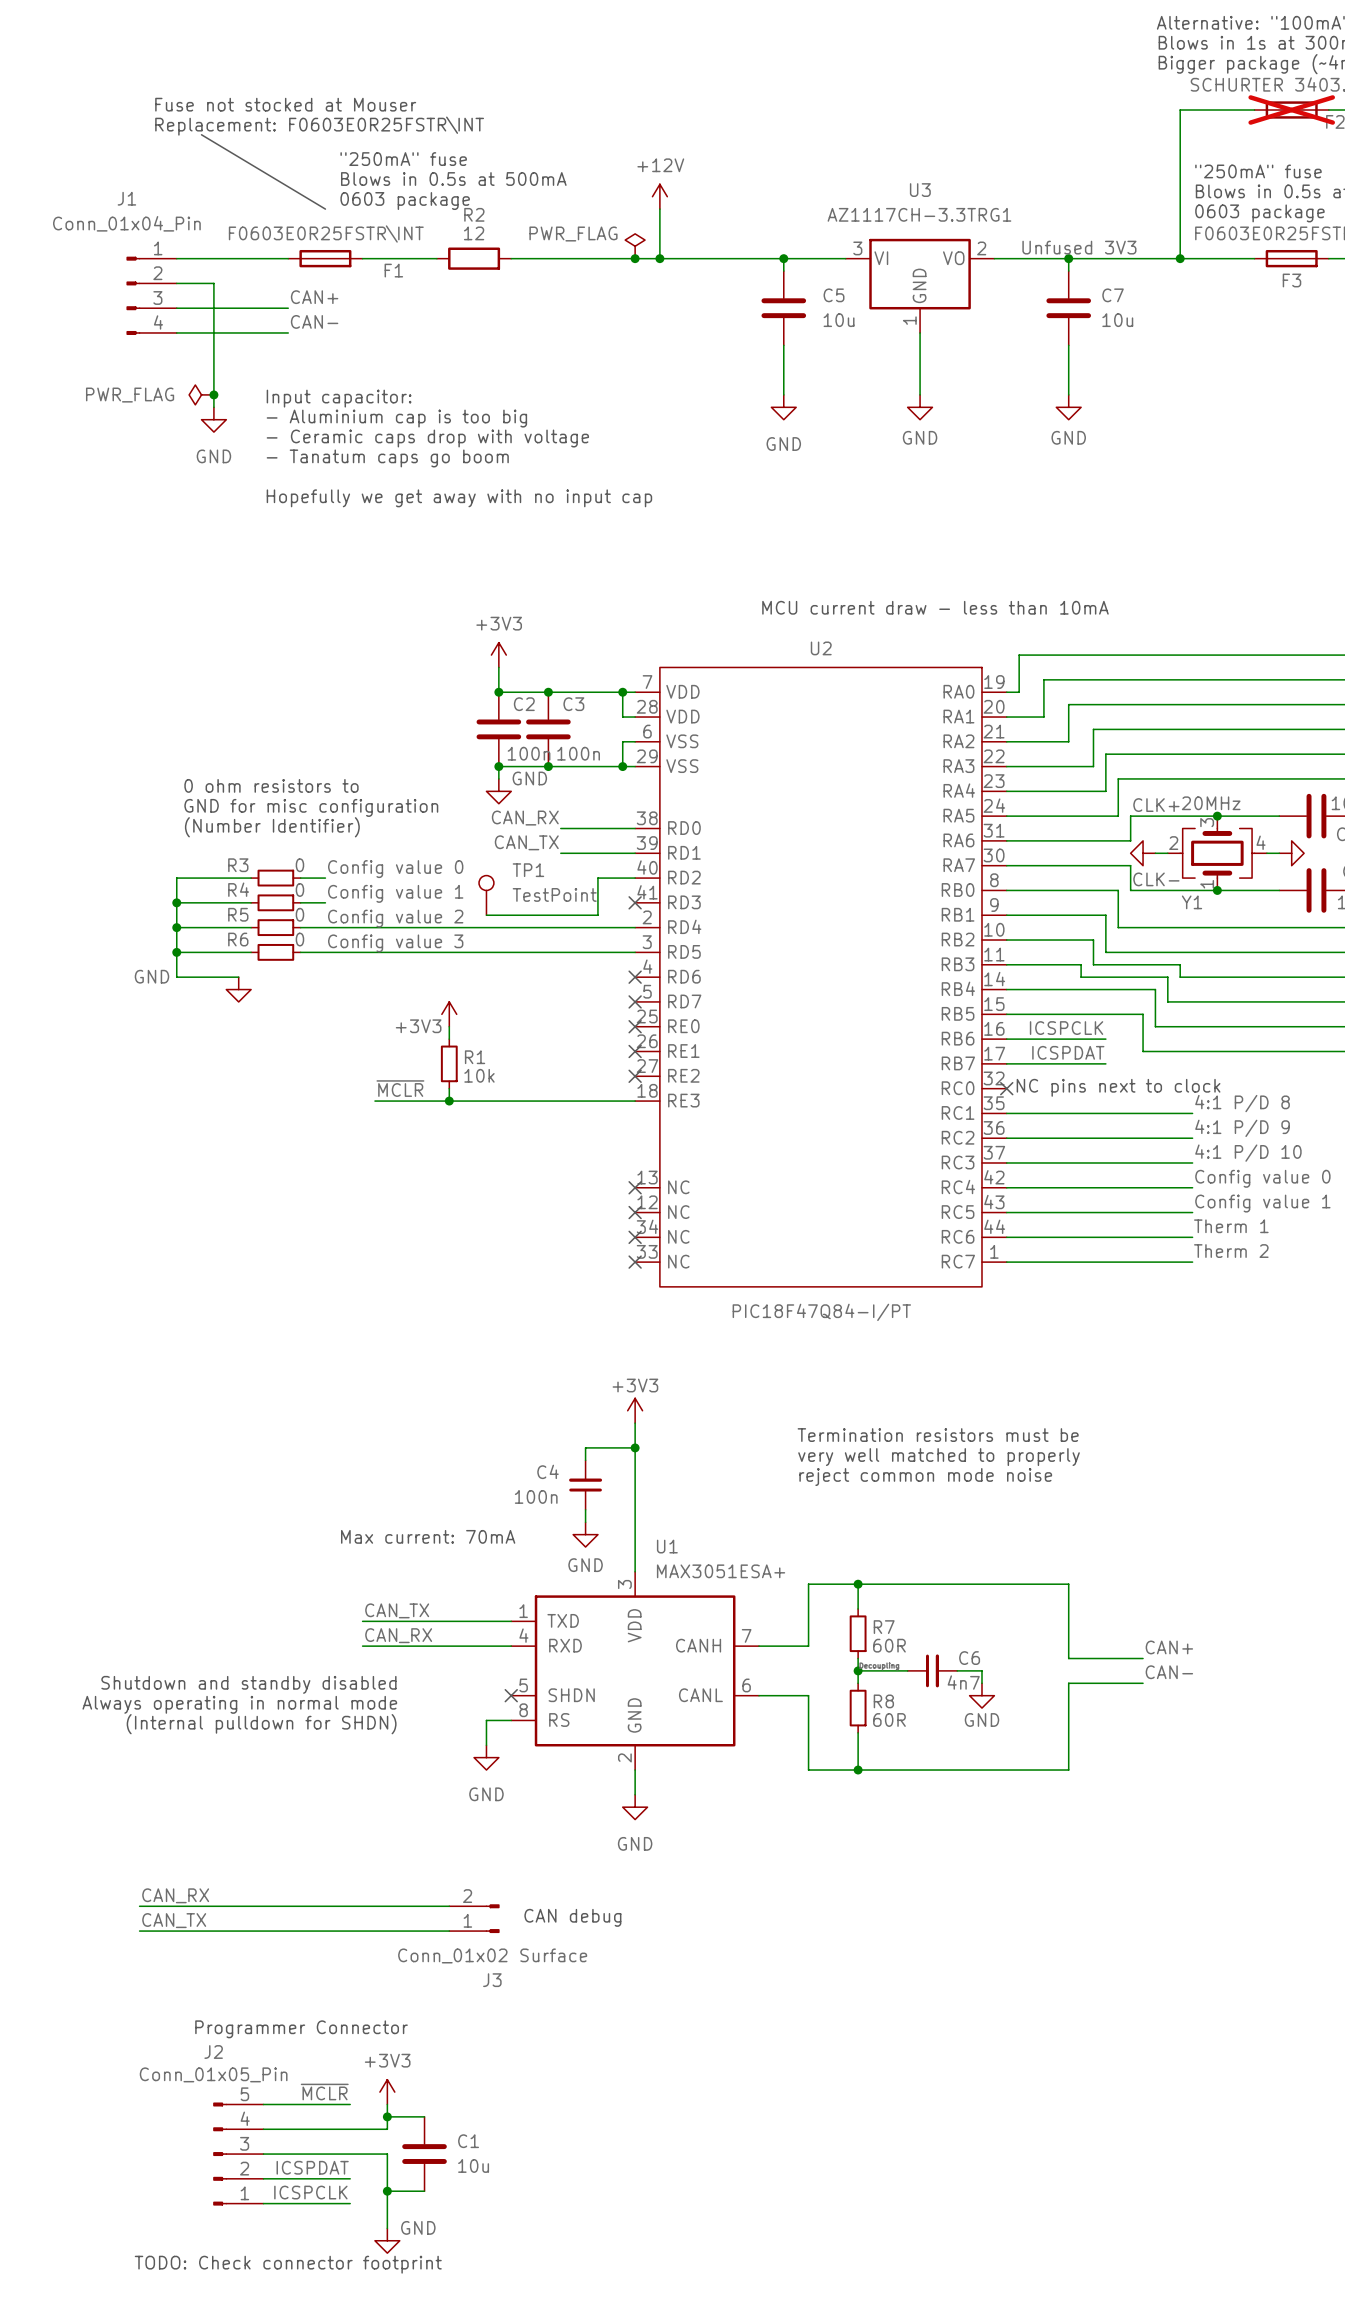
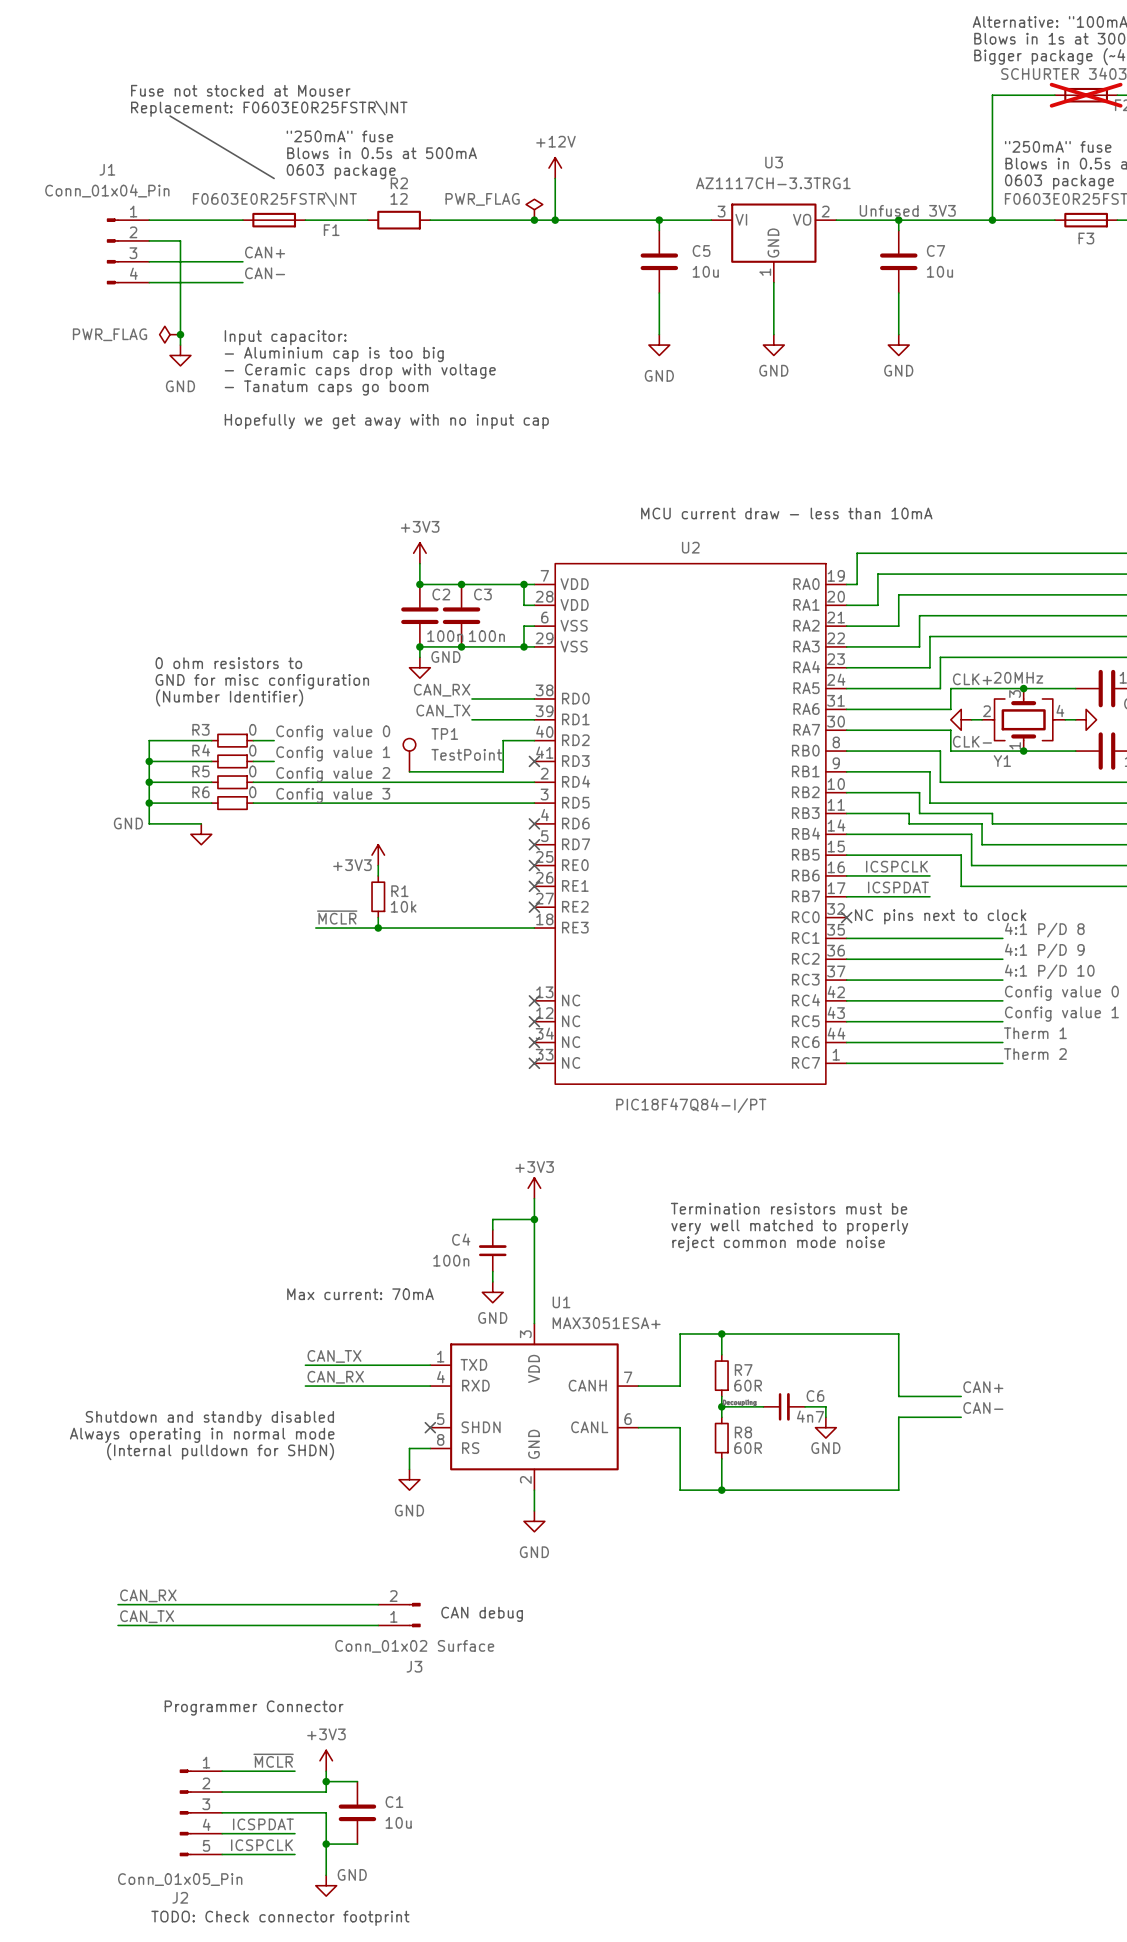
J2 flip: as is (220, 2154) -> up-down (185, 1812)
text position: TODO: Check connector footprint (288, 2264) -> TODO: Check connector footprint (280, 1918)

